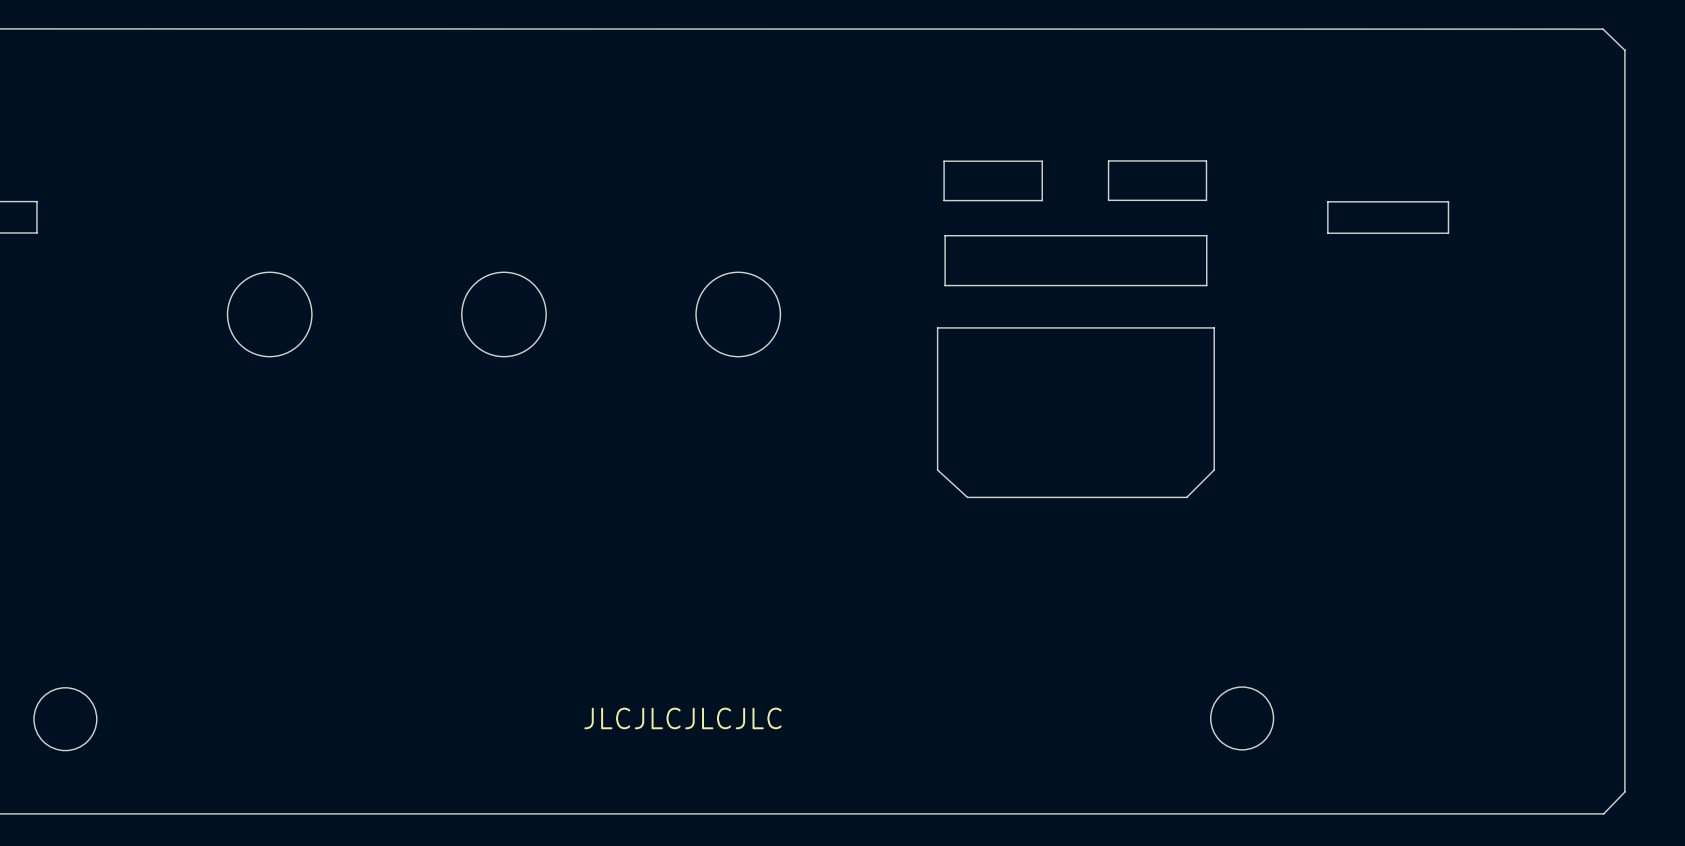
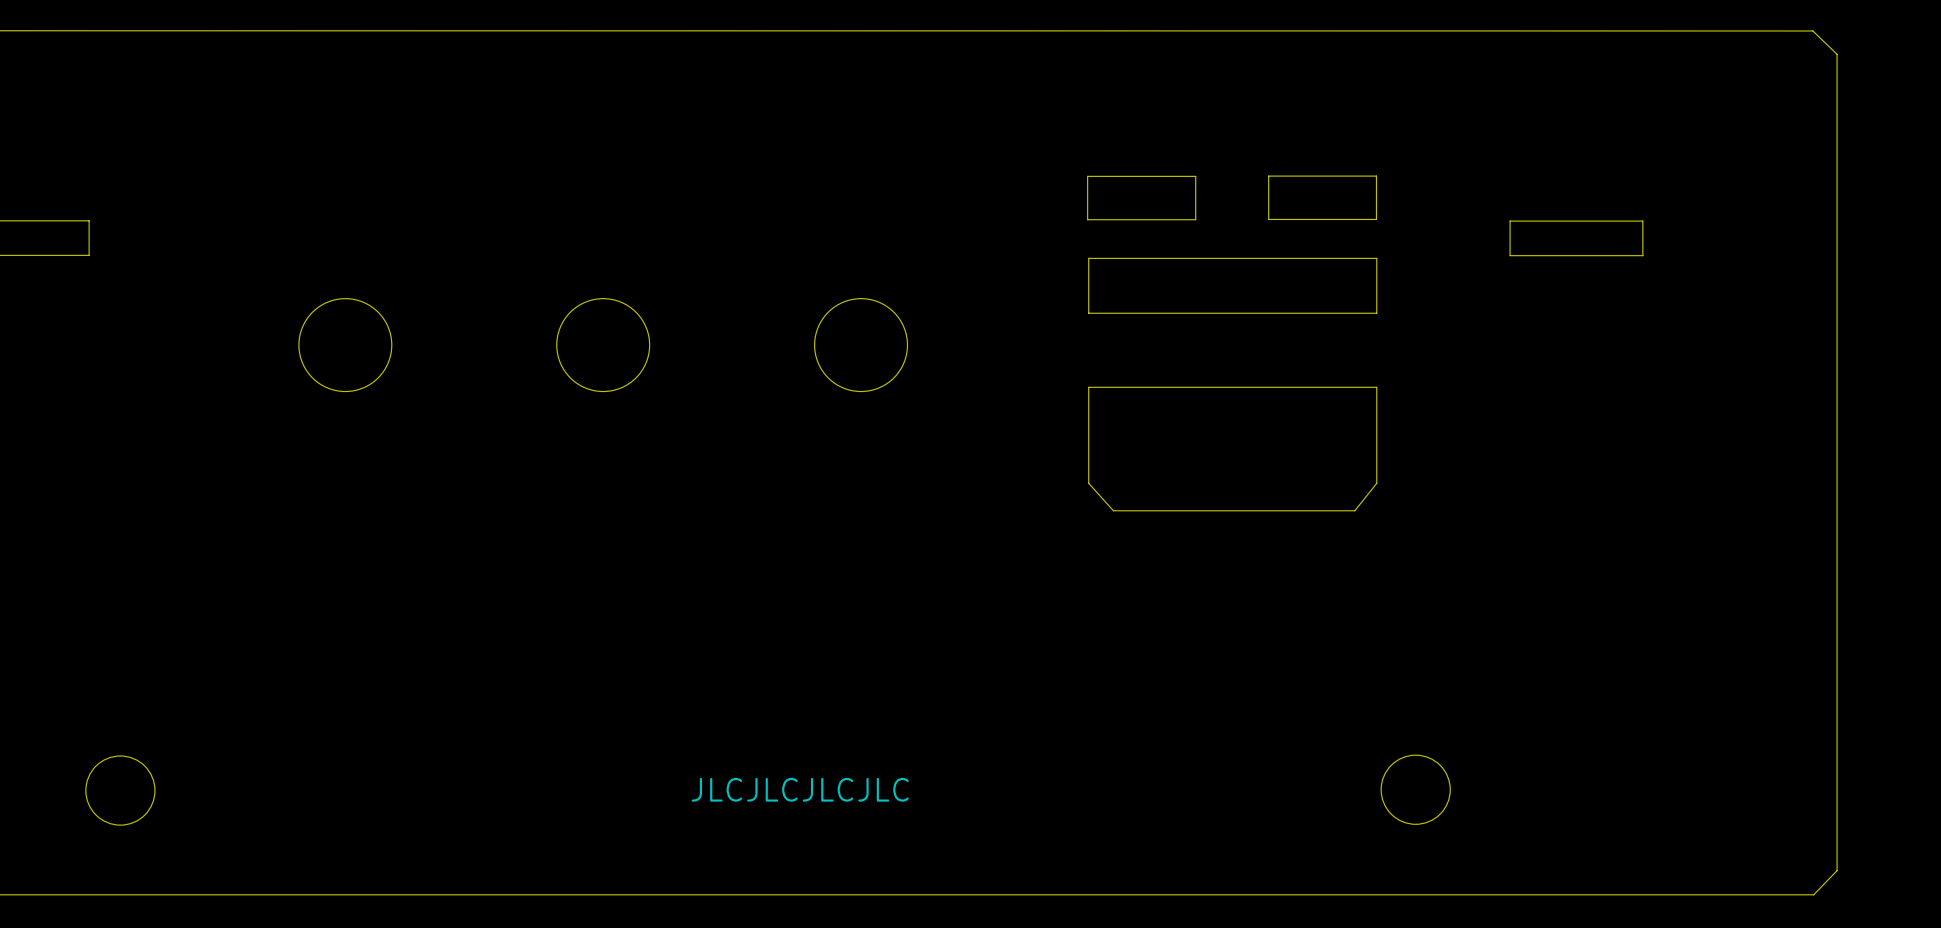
board edge: (1214, 327) (937, 327) (937, 469) (967, 497) (1186, 497) (1214, 469) (1214, 327) -> (1376, 387) (1376, 483) (1354, 510) (1113, 510) (1088, 483) (1088, 387) (1376, 387)

